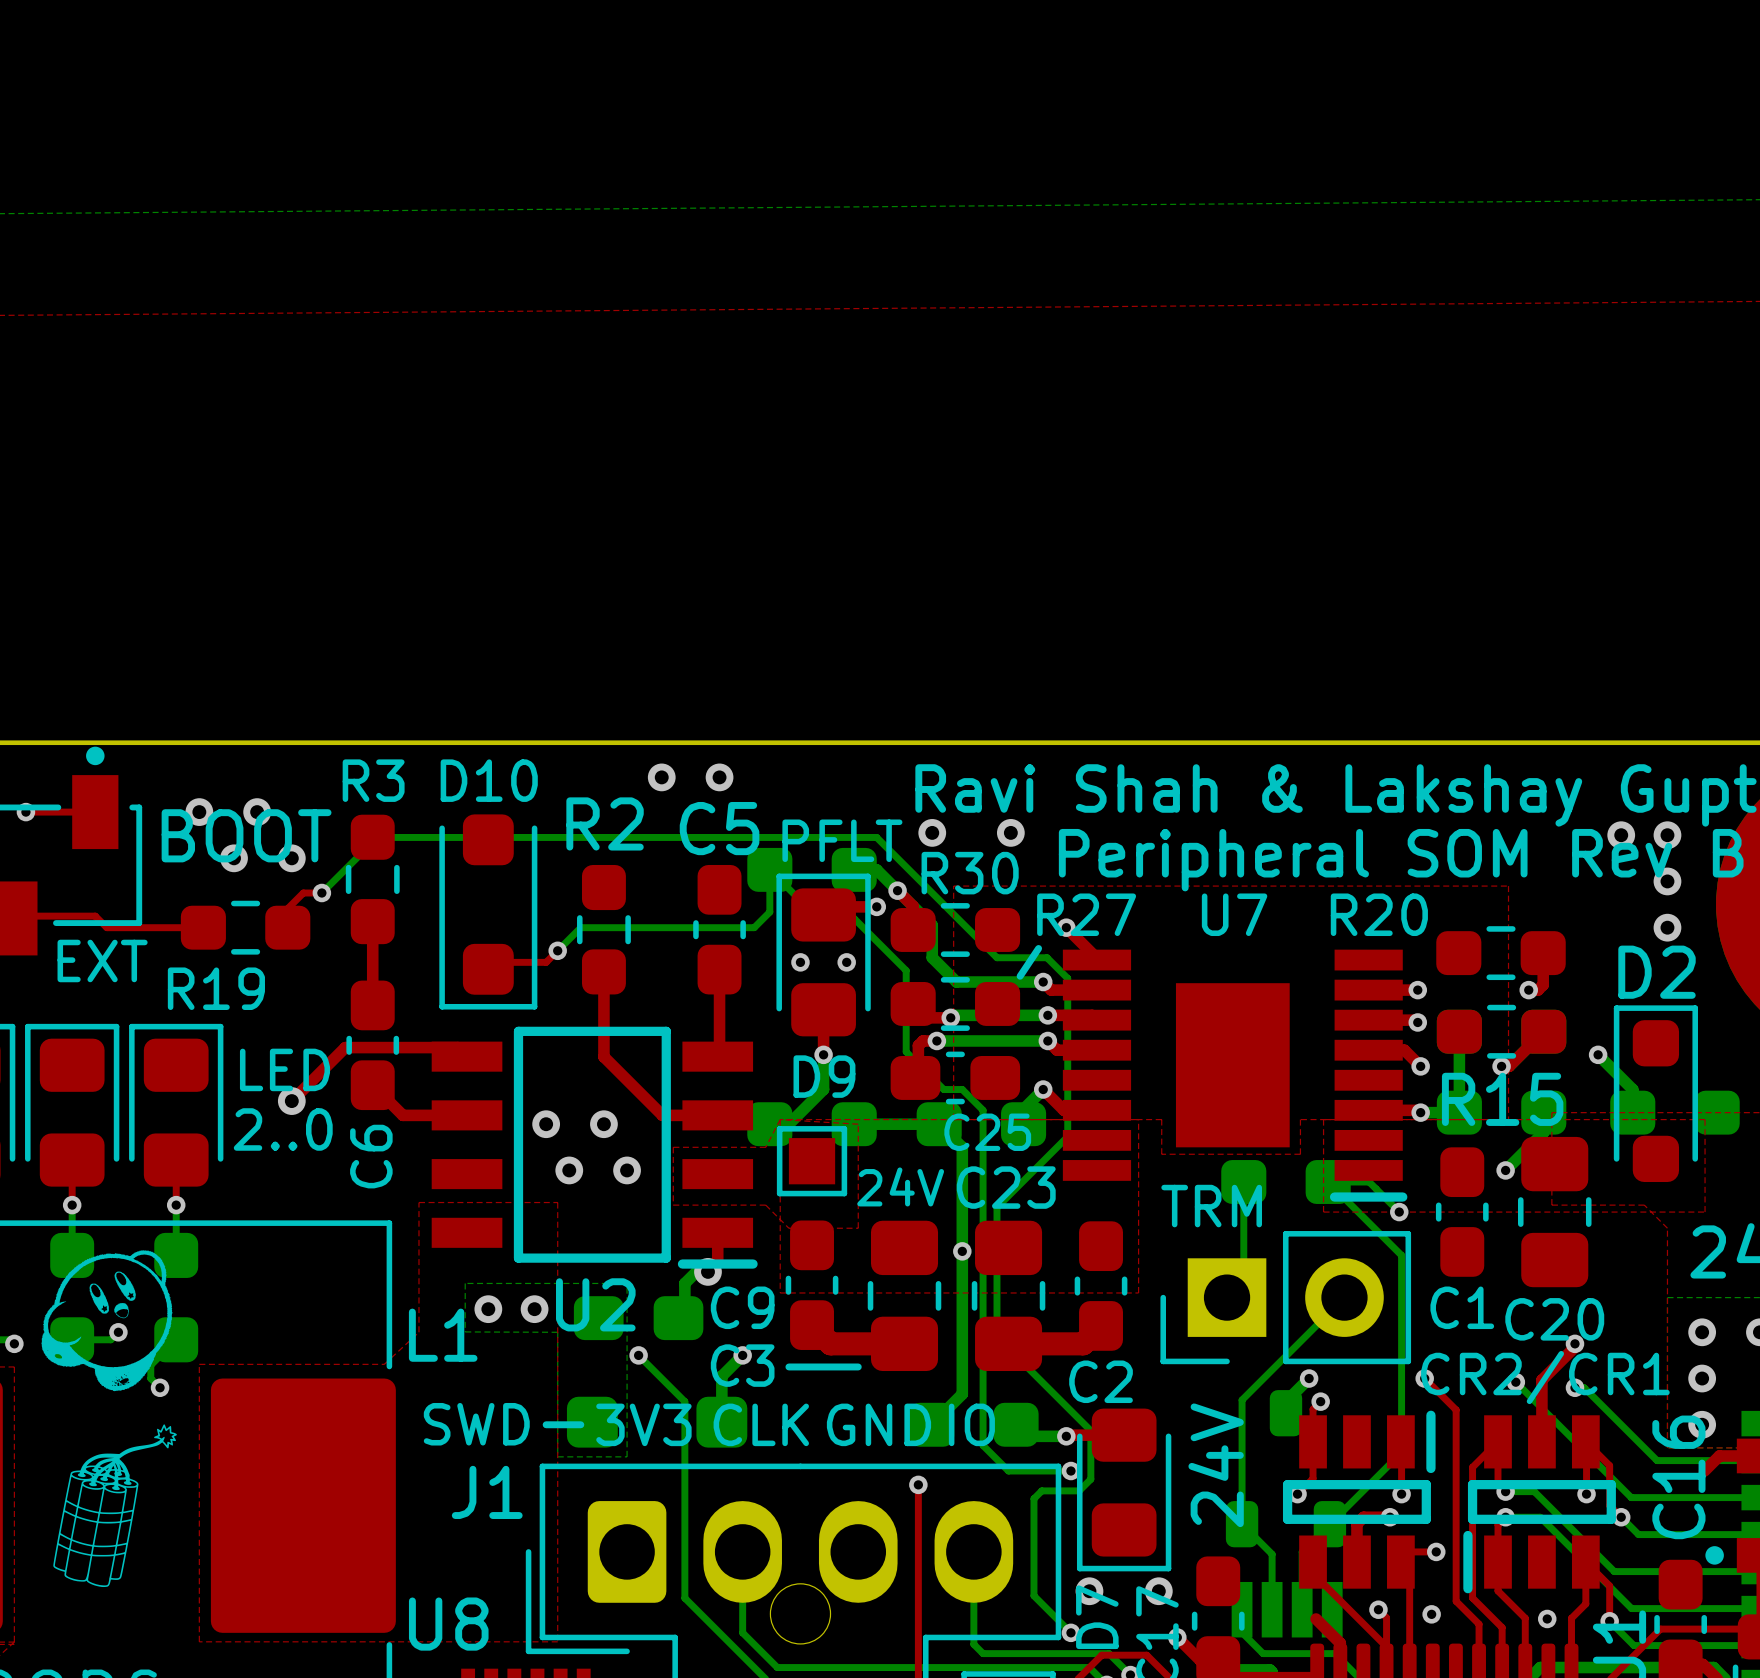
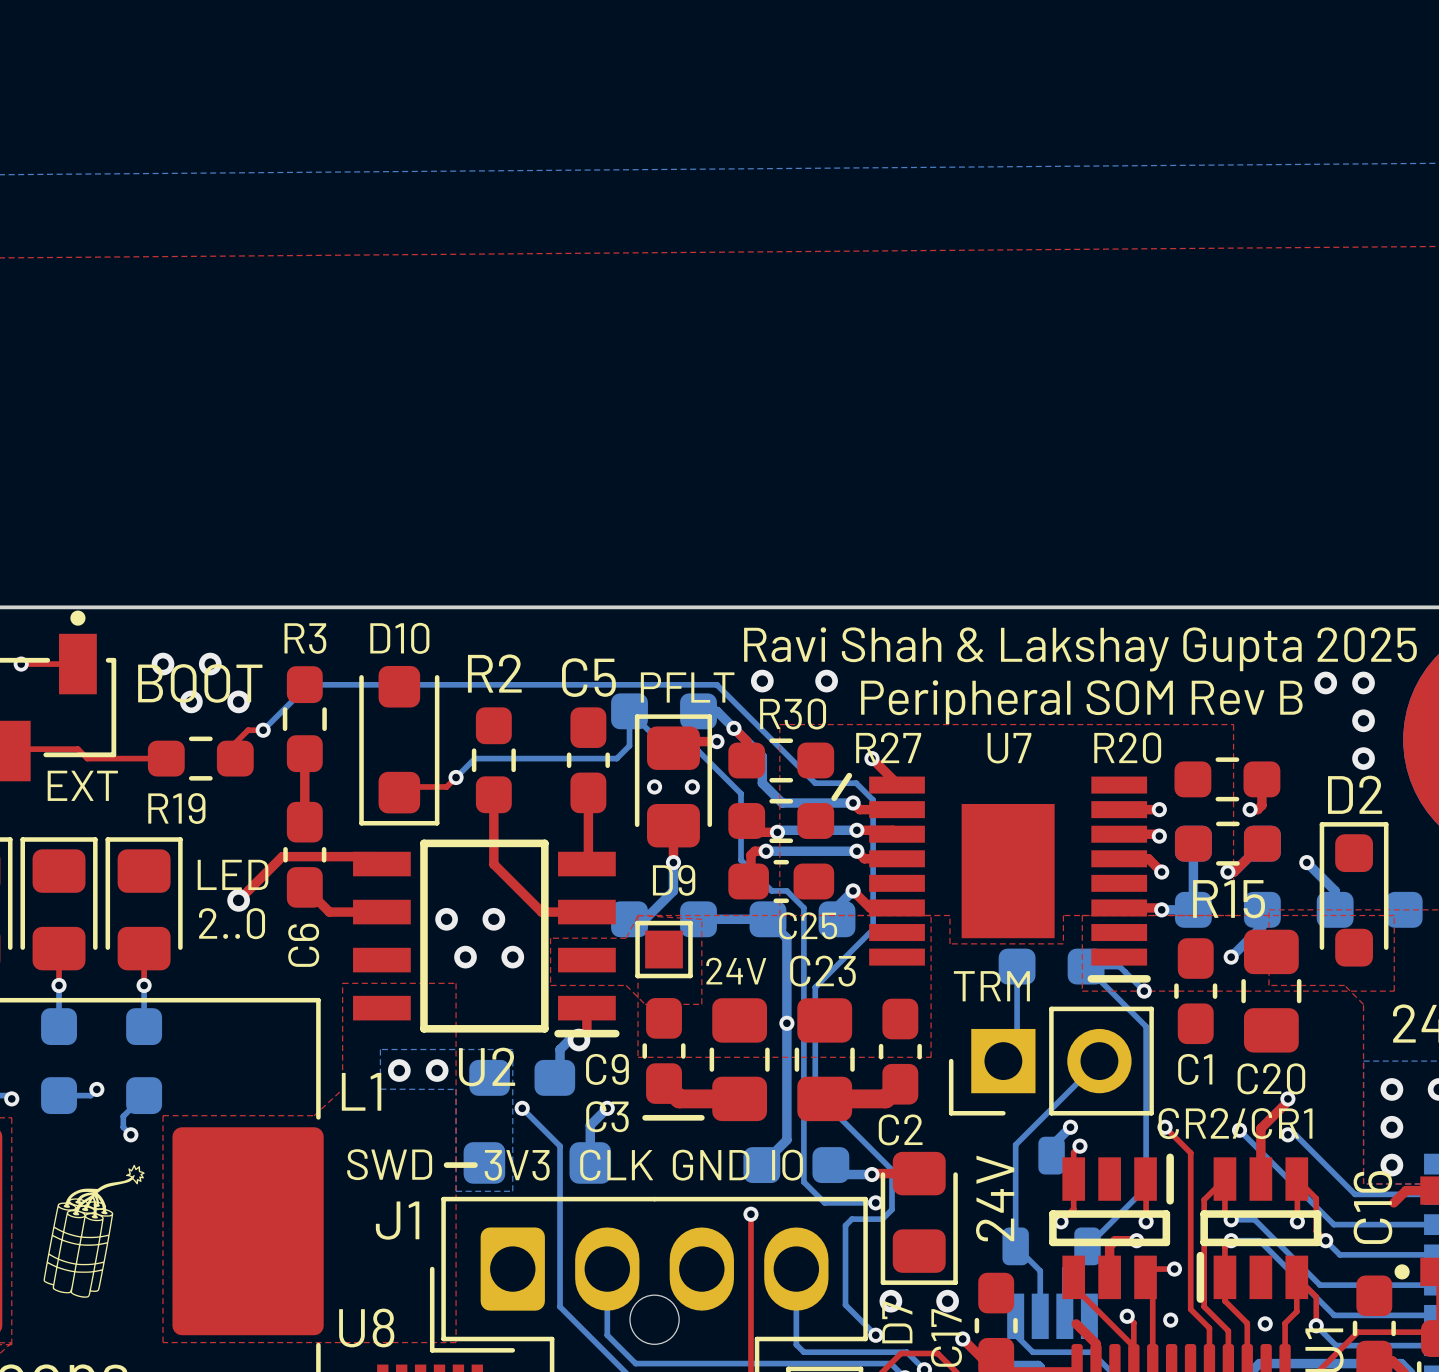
via: (661, 777) -> none
via: (719, 777) -> none
drawing: [41, 1249, 173, 1392] -> none

